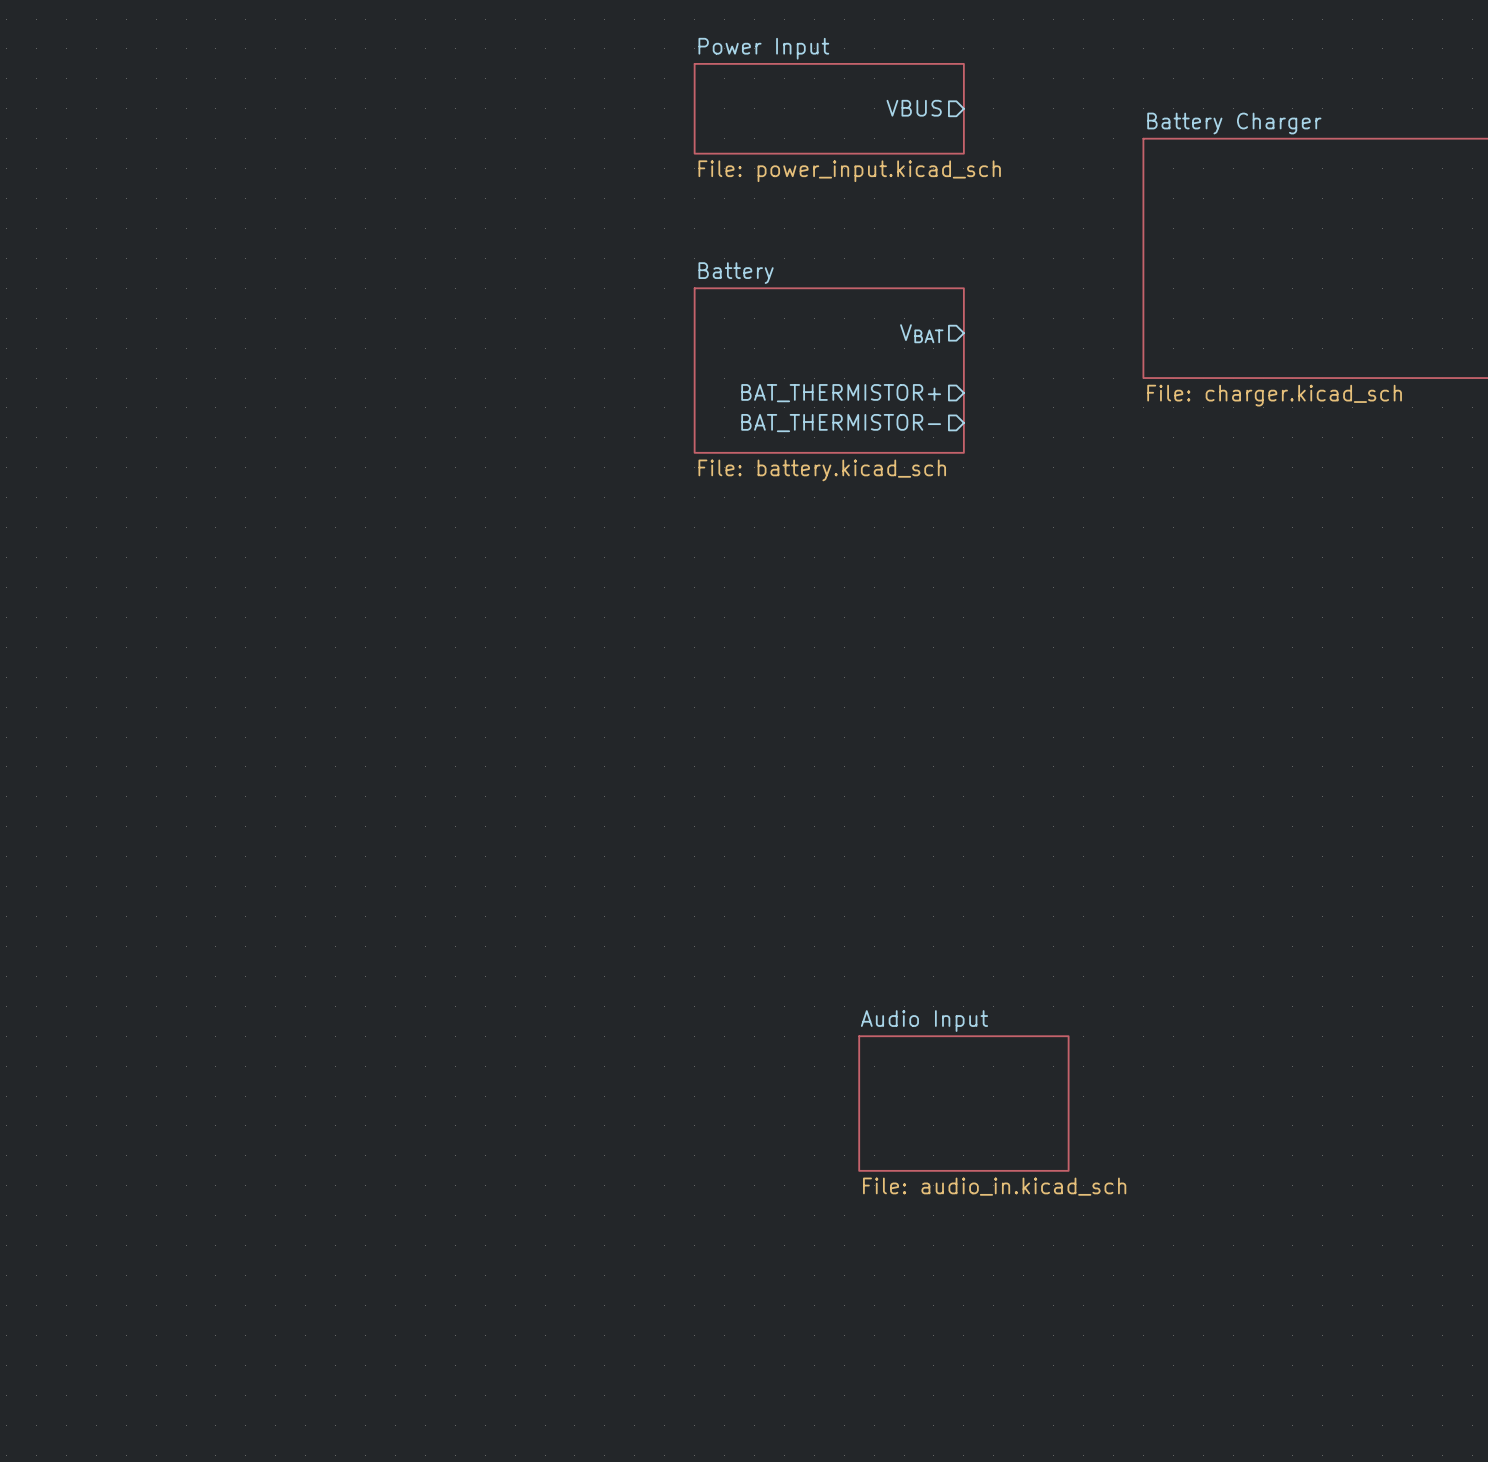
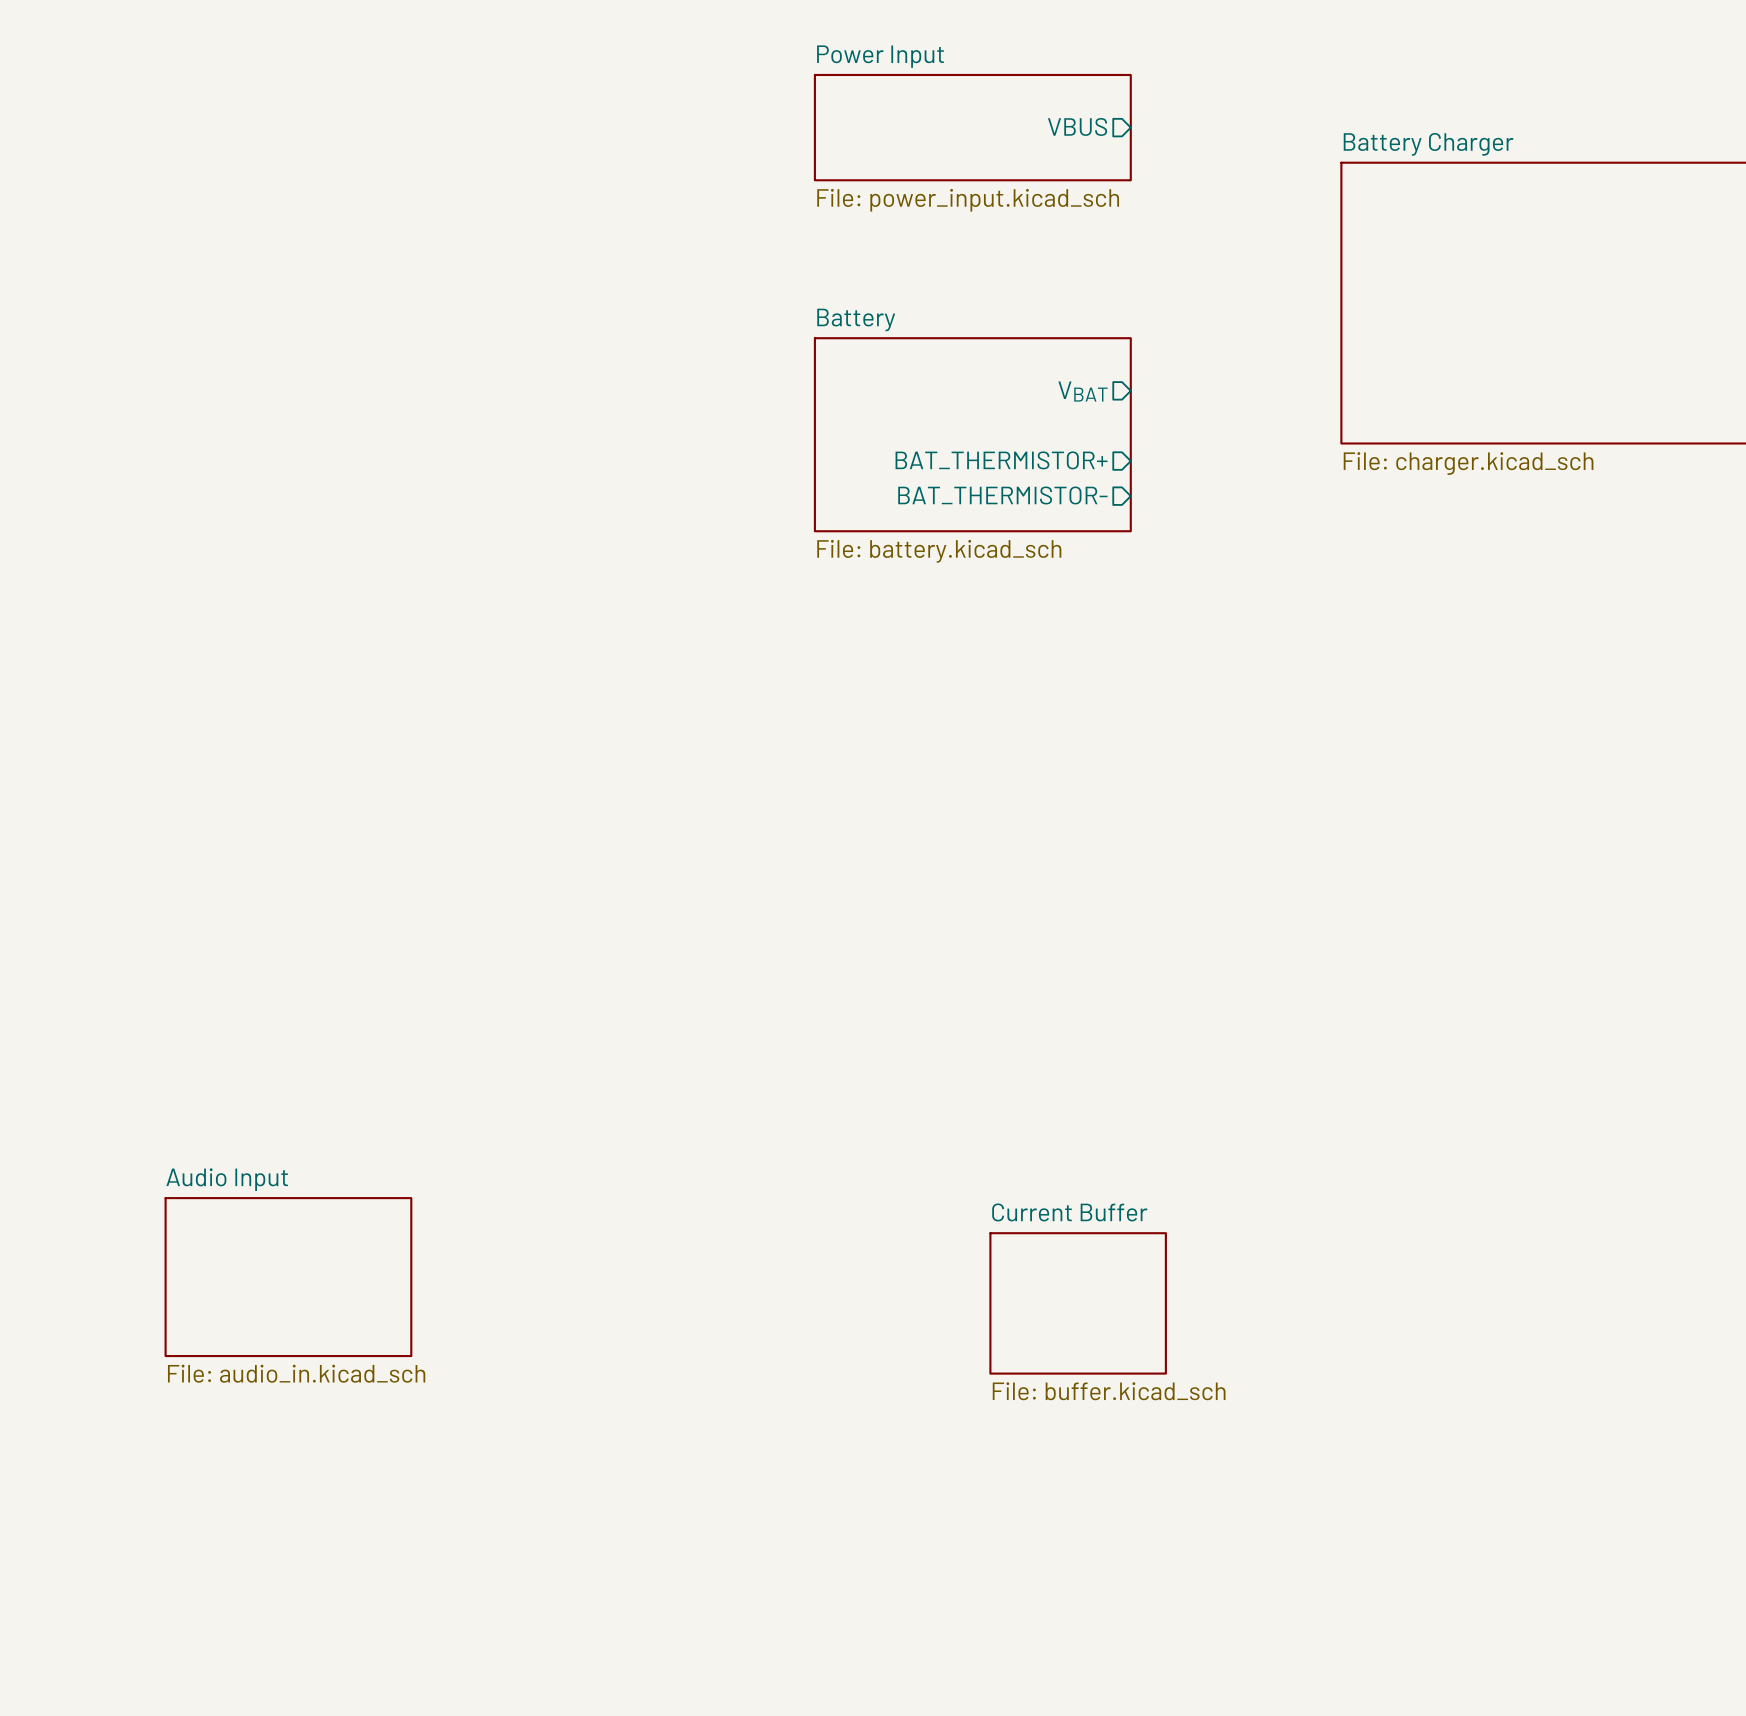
sheet Audio Input: none -> File: audio_in.kicad_sch (288, 1277)
sheet Audio Input: File: audio_in.kicad_sch (963, 1103) -> none
sheet Current Buffer: none -> File: buffer.kicad_sch (1078, 1303)

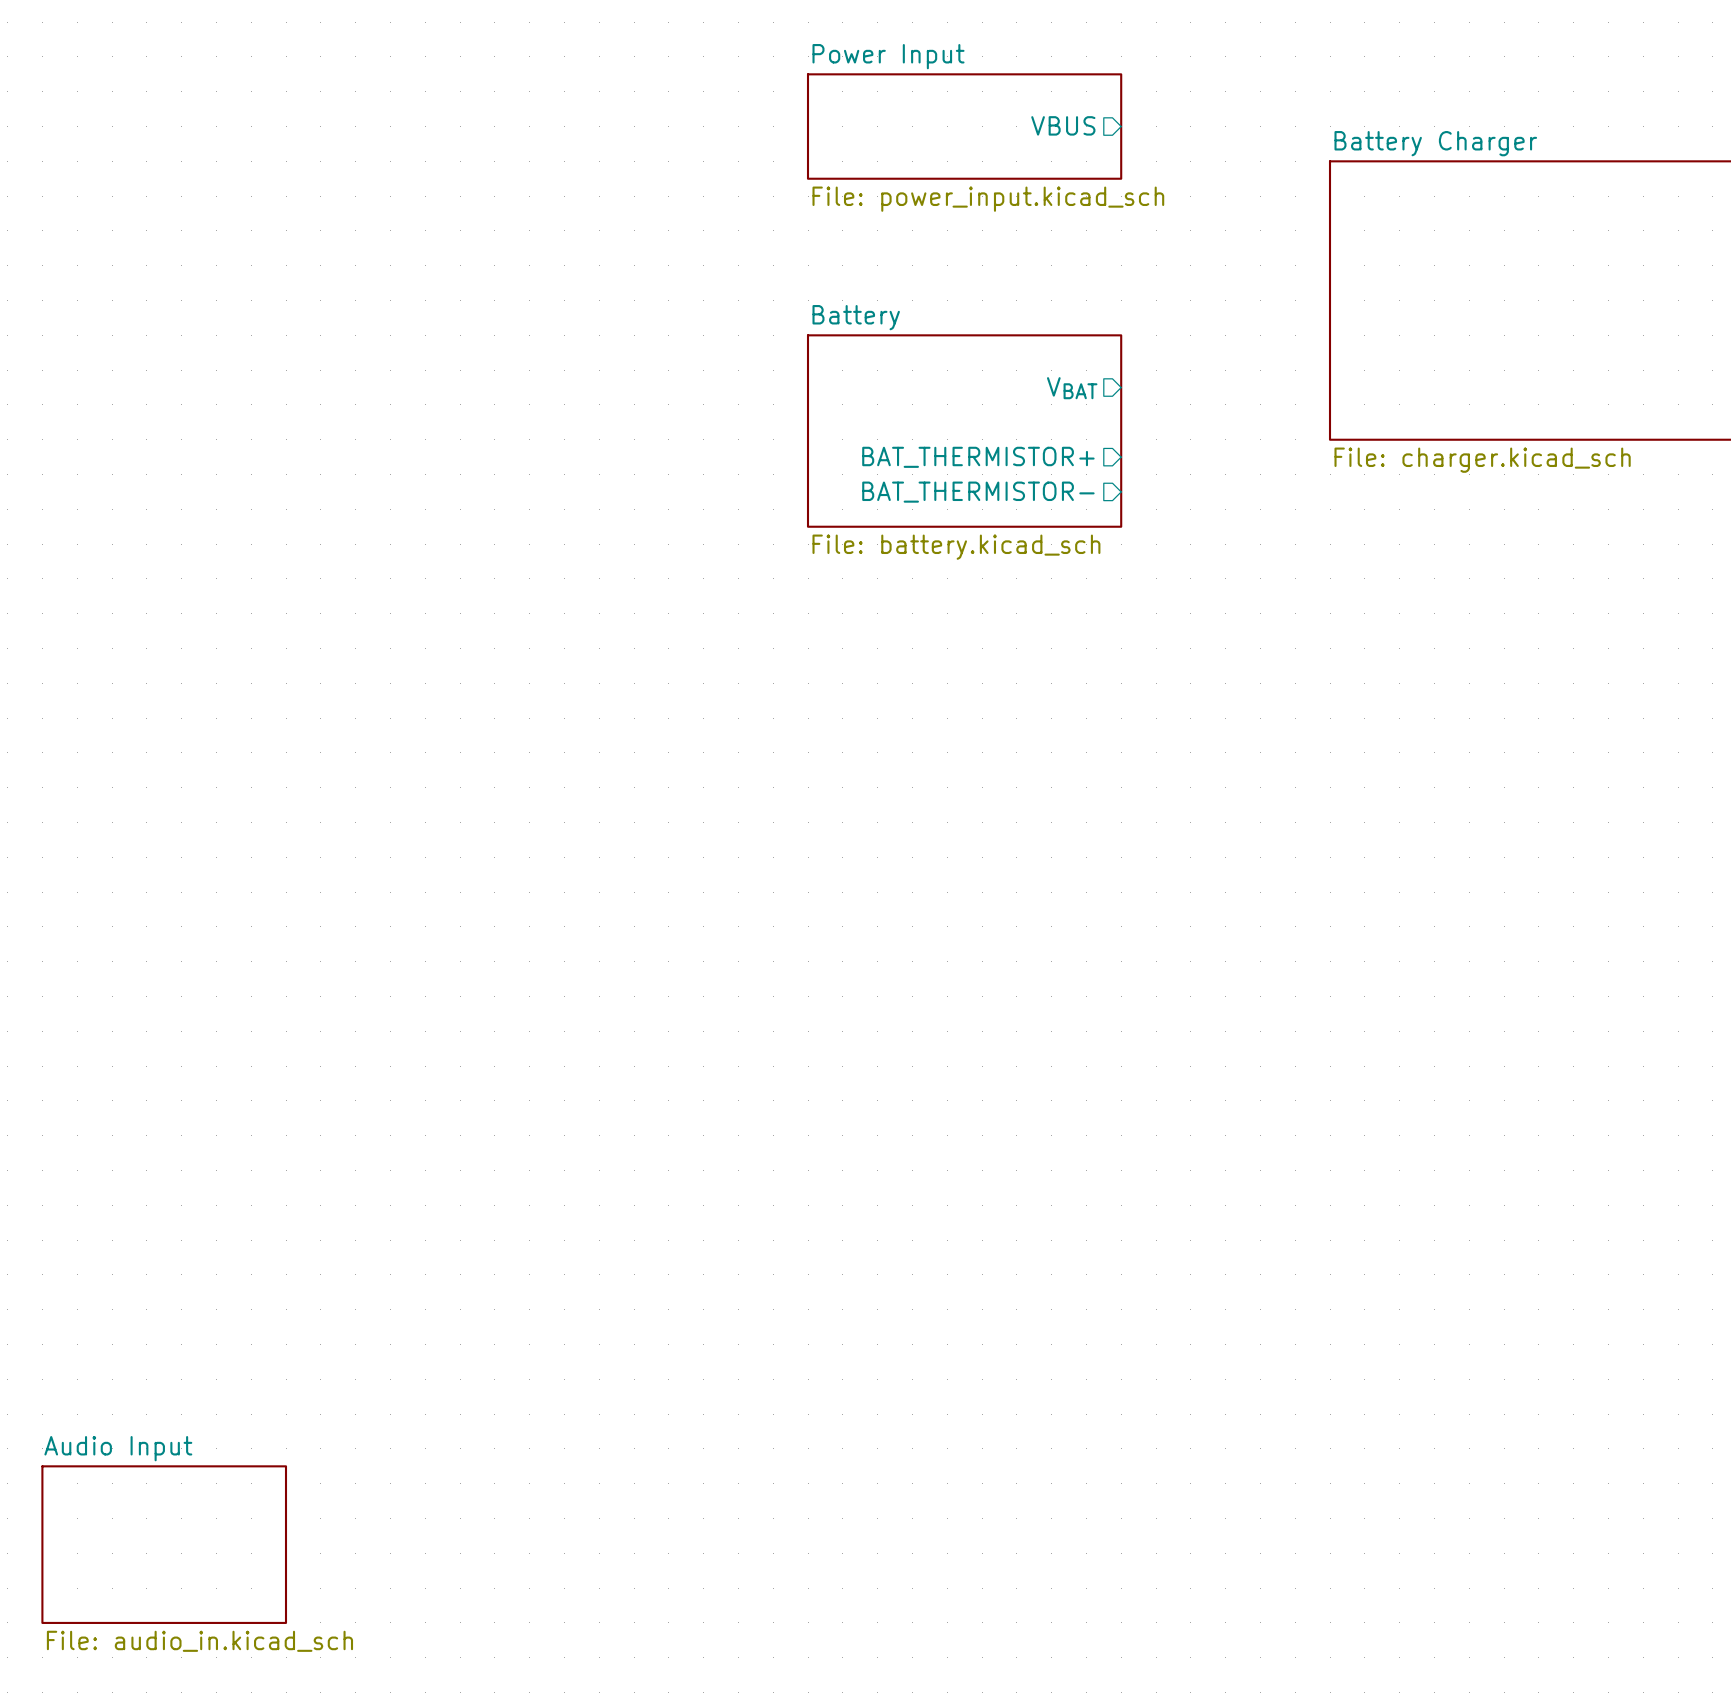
sheet Audio Input position: (288, 1277) -> (164, 1544)
sheet Current Buffer: File: buffer.kicad_sch (1078, 1303) -> none

